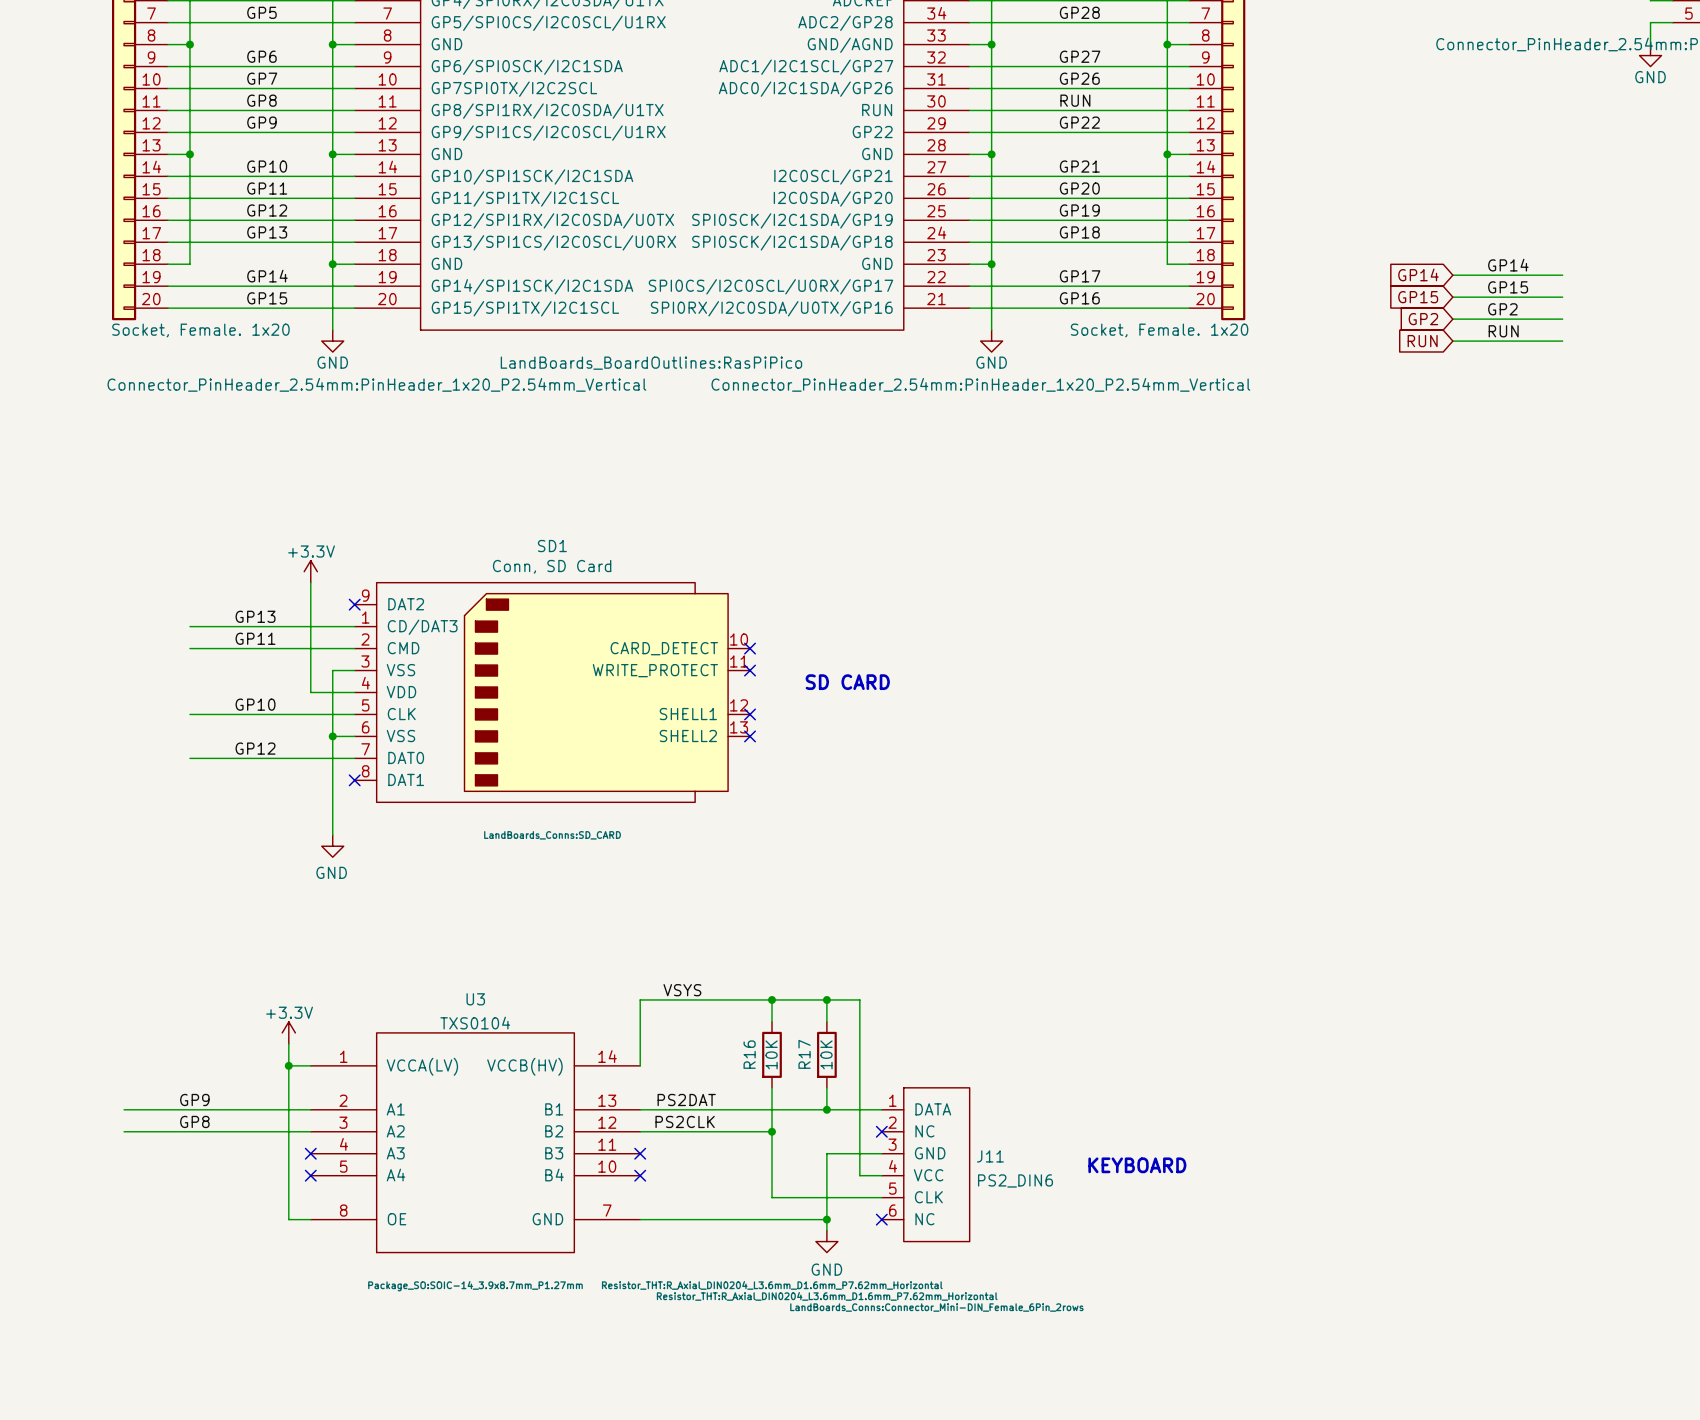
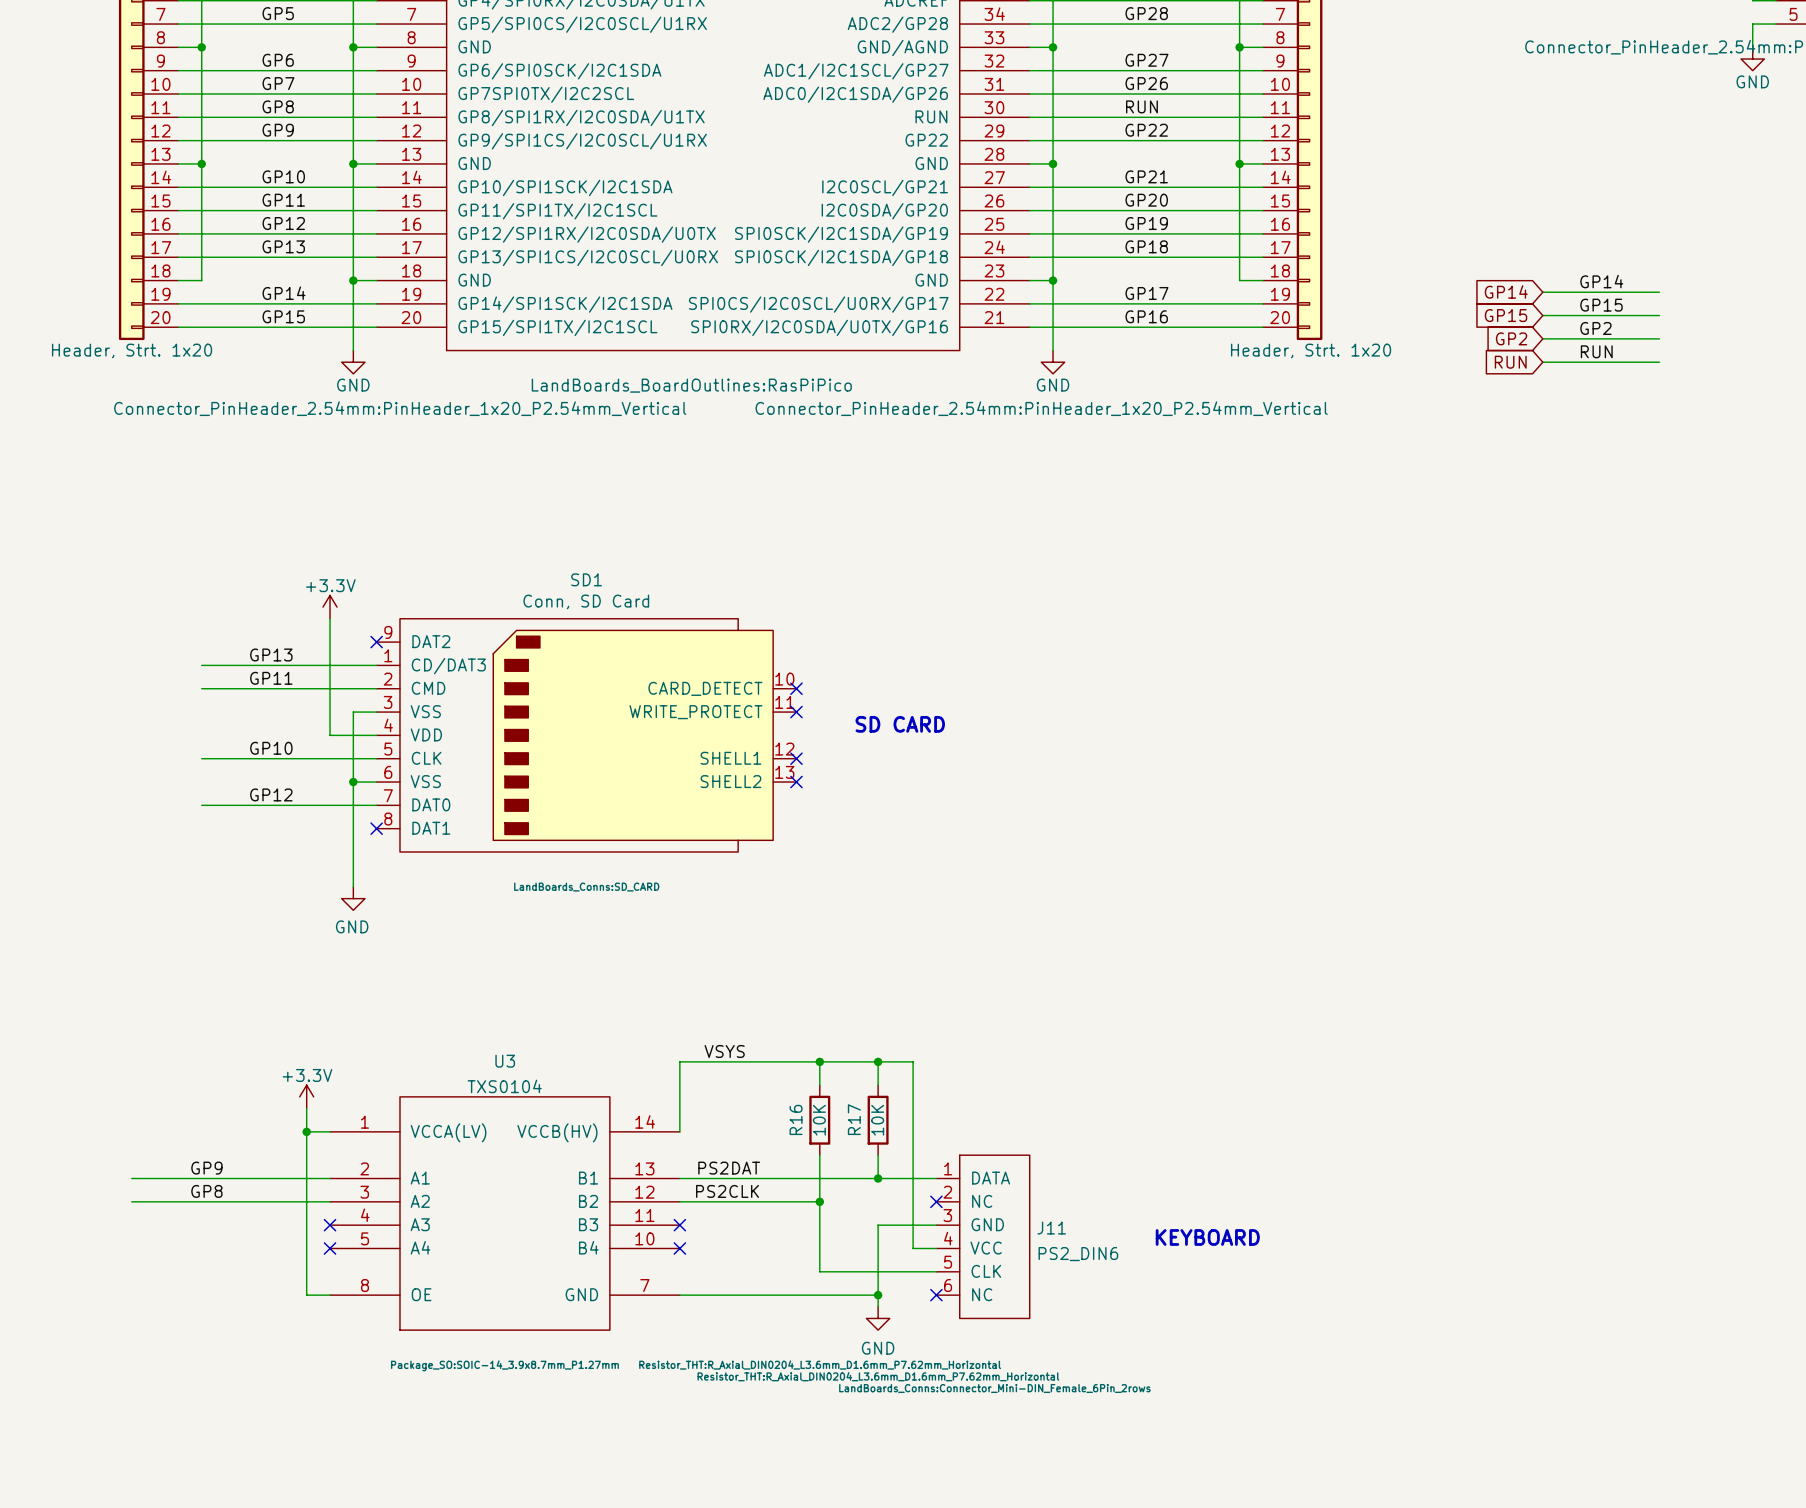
part value: Socket, Female. 1x20 (200, 330) -> Header, Strt. 1x20 (132, 350)
part value: Socket, Female. 1x20 (1159, 330) -> Header, Strt. 1x20 (1311, 350)

